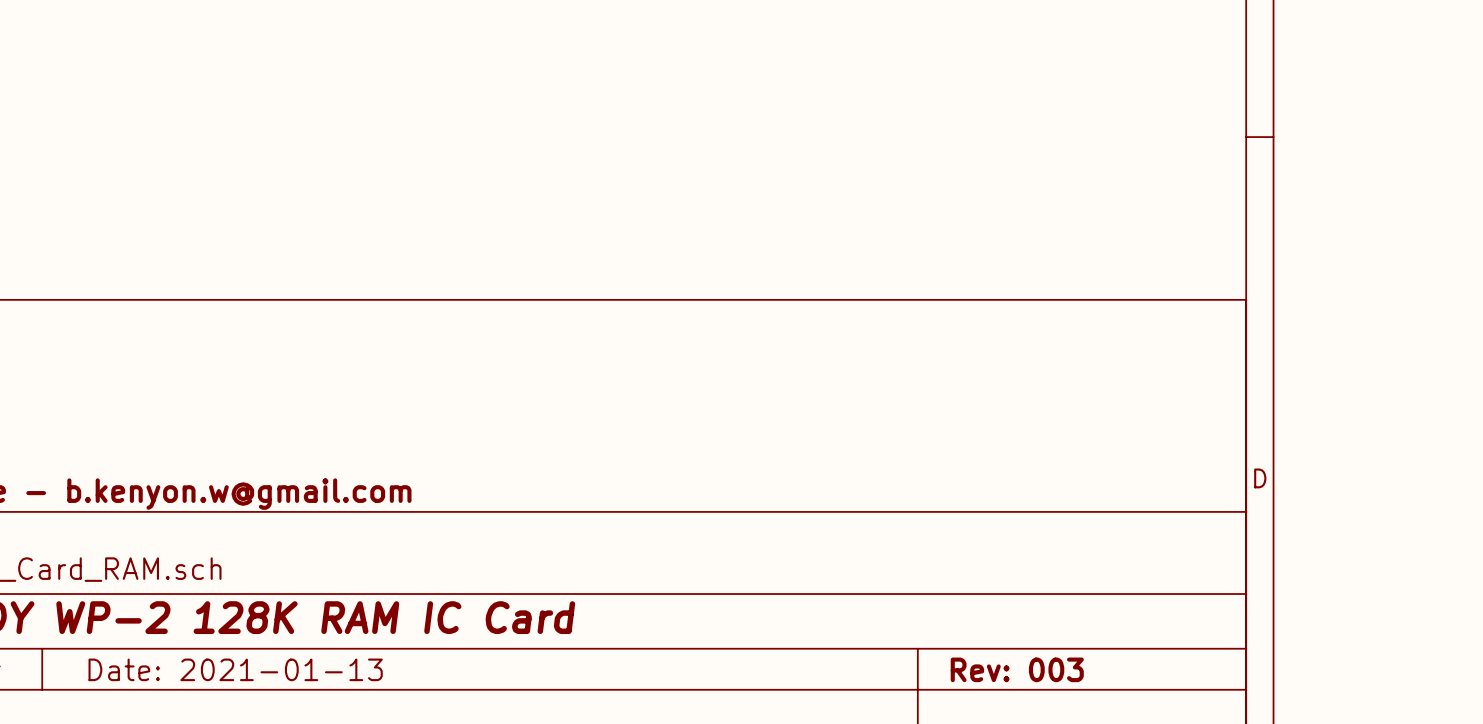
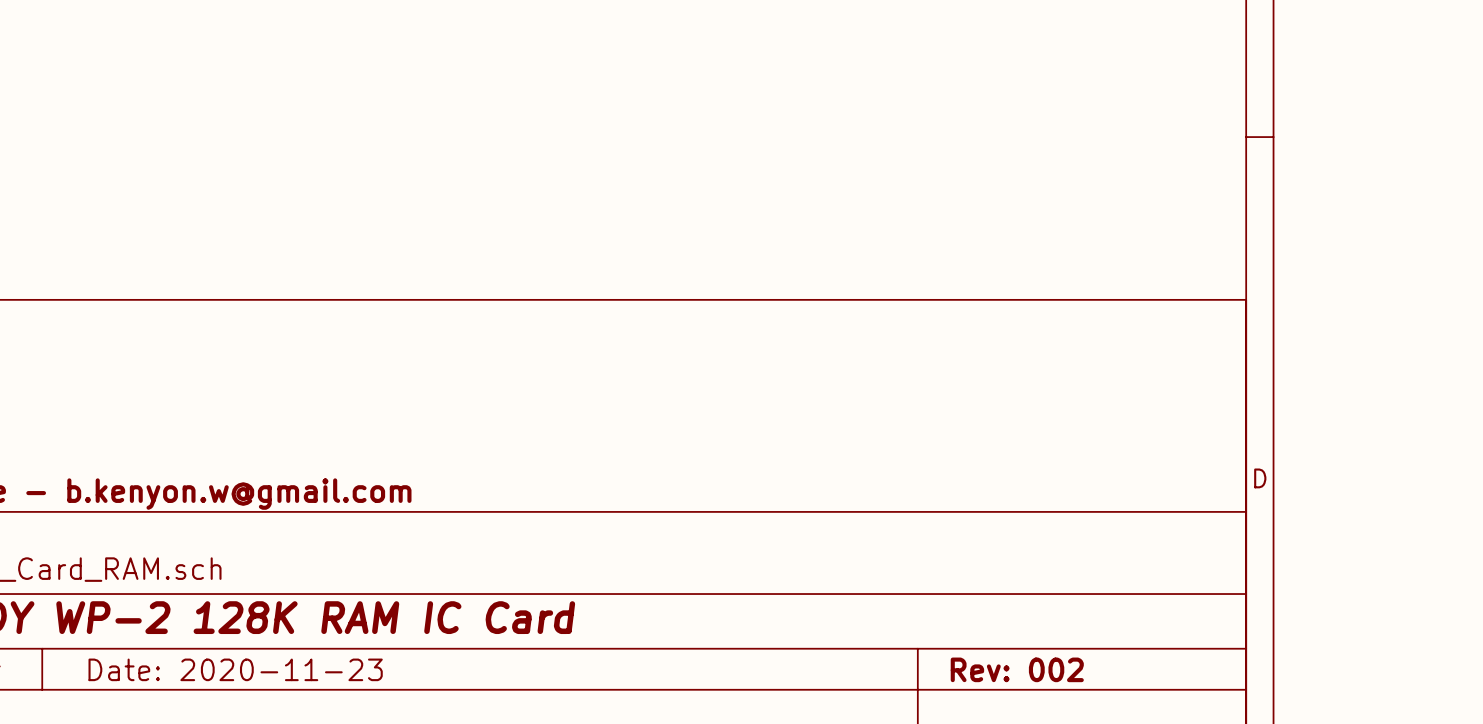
title block: Date: 2021-01-13 (235, 669) -> Date: 2020-11-23 (235, 669)
title block: Rev: 003 (1017, 669) -> Rev: 002 (1017, 669)

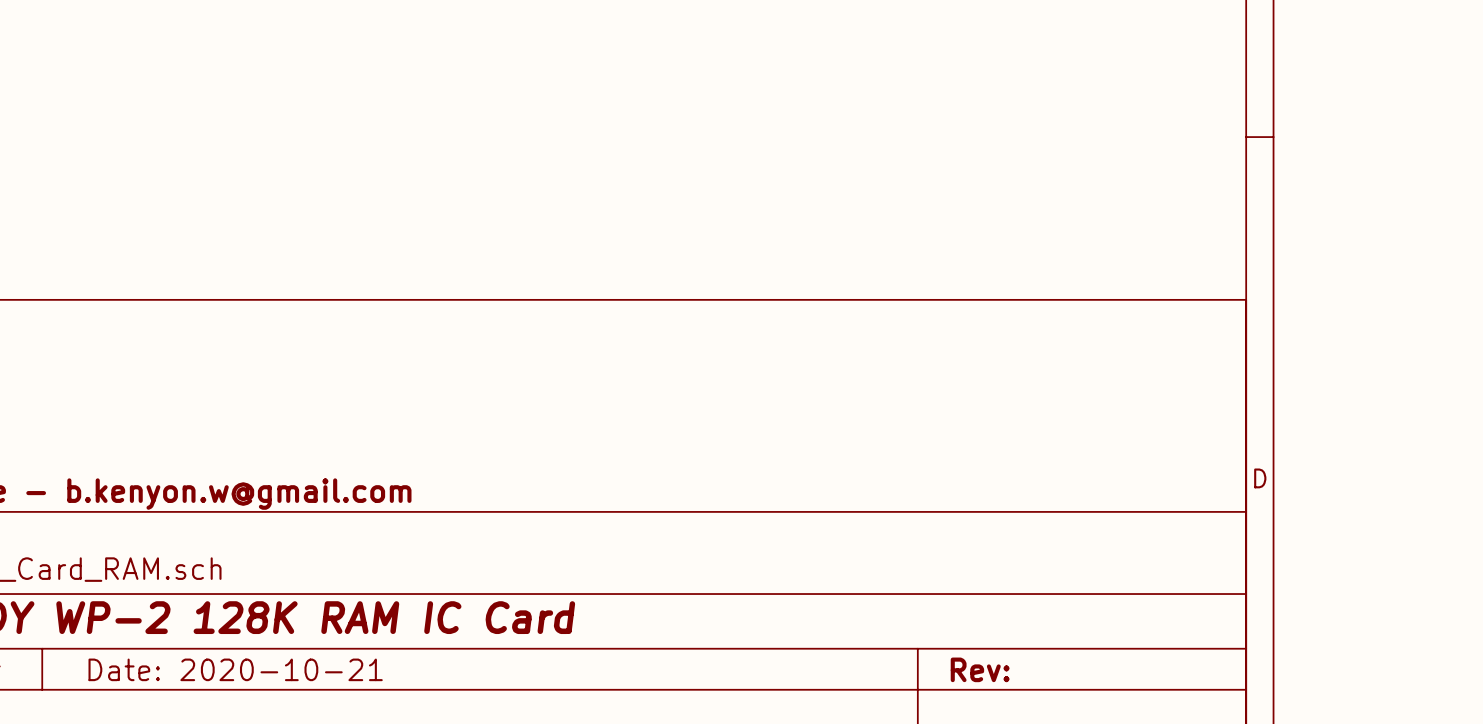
title block: Date: 2020-11-23 (235, 669) -> Date: 2020-10-21 (235, 669)
title block: Rev: 002 (1017, 669) -> Rev: (980, 669)

